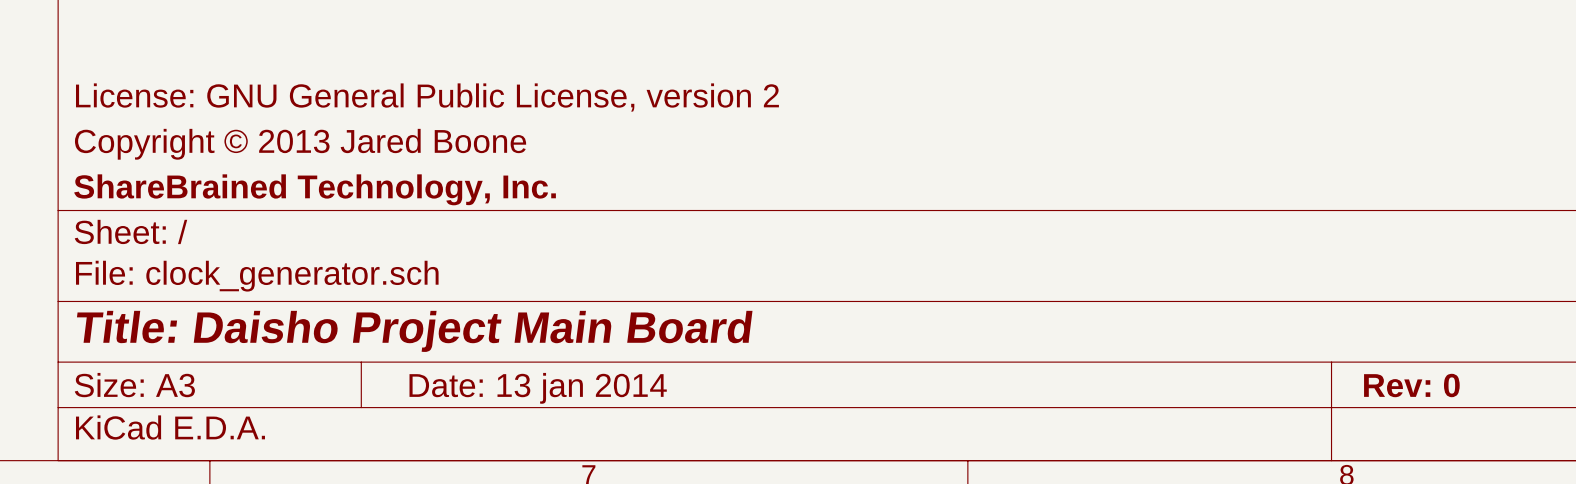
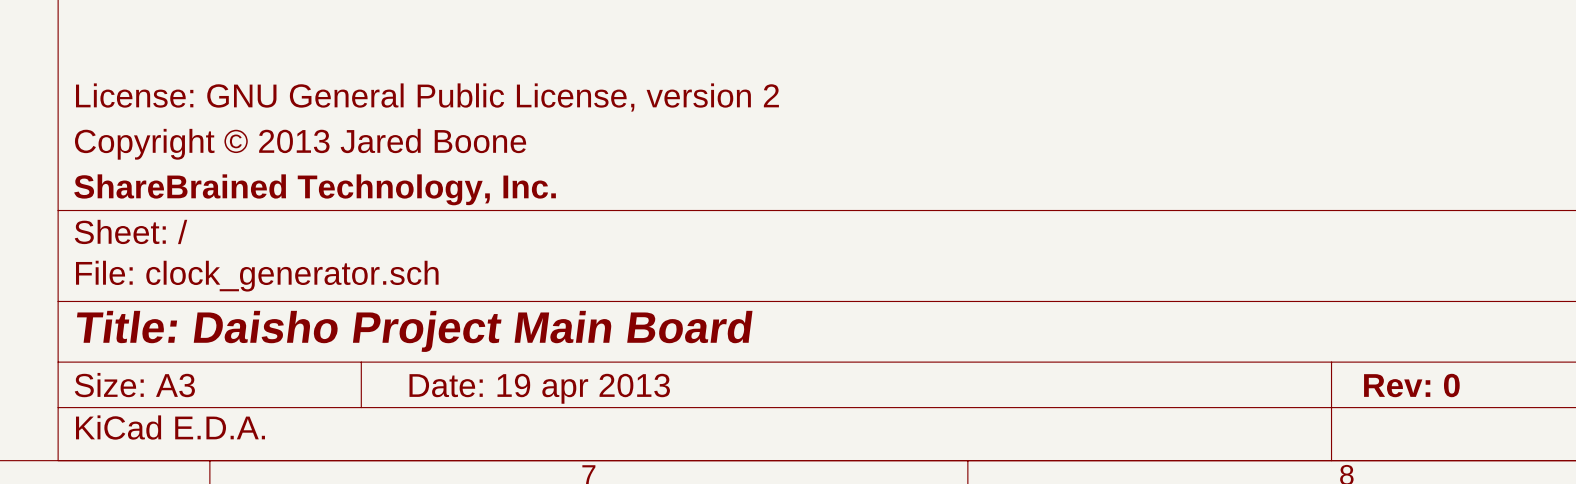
title block: Date: 13 jan 2014 (538, 388) -> Date: 19 apr 2013 (539, 388)

